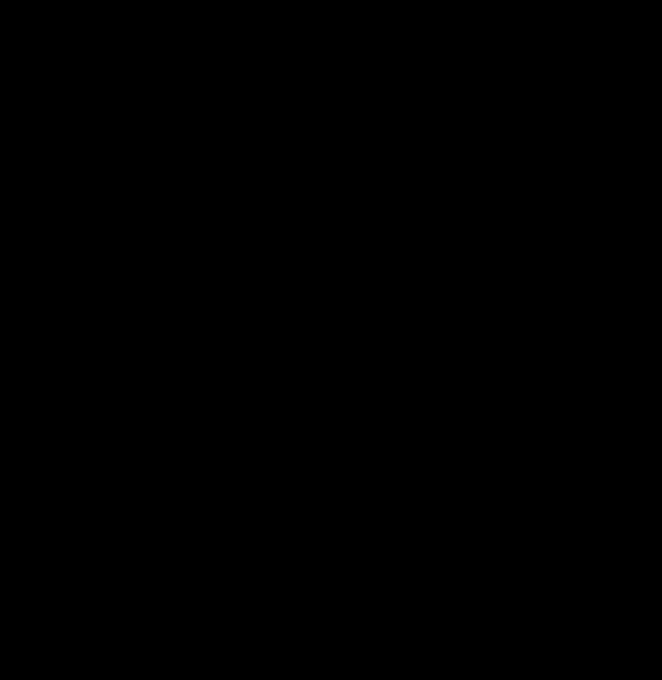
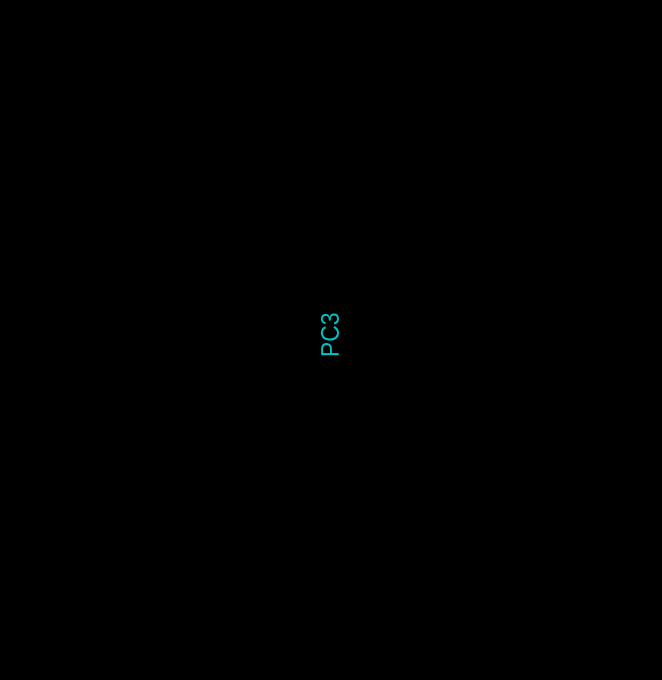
text: none -> PC3 (329, 334)

